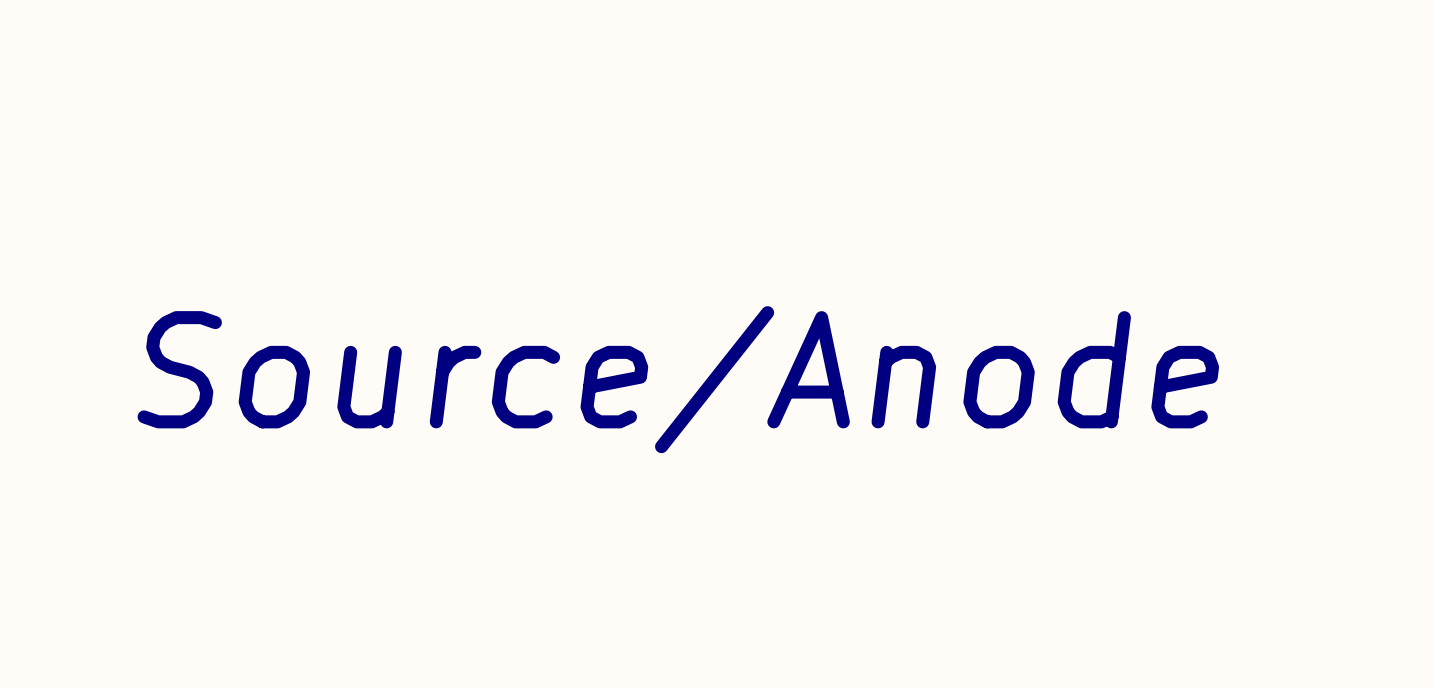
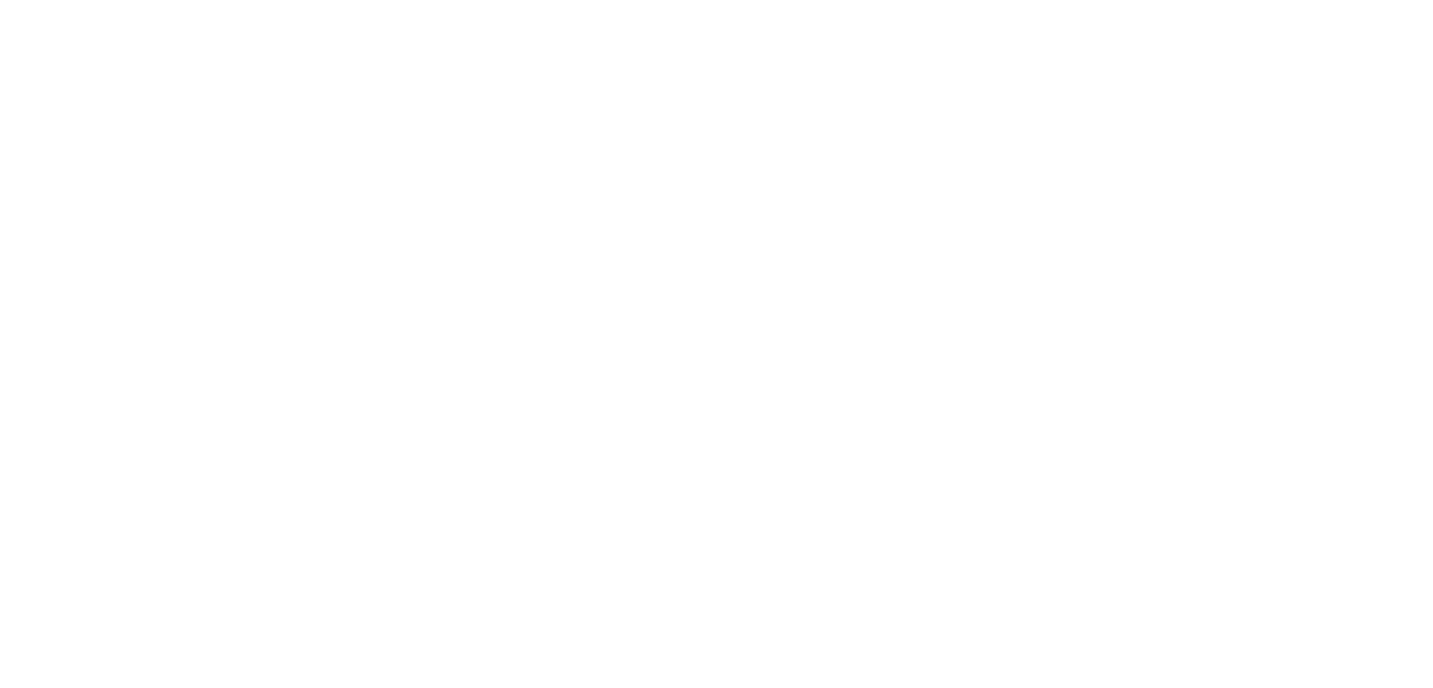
text: Source/Anode (678, 379) -> none

